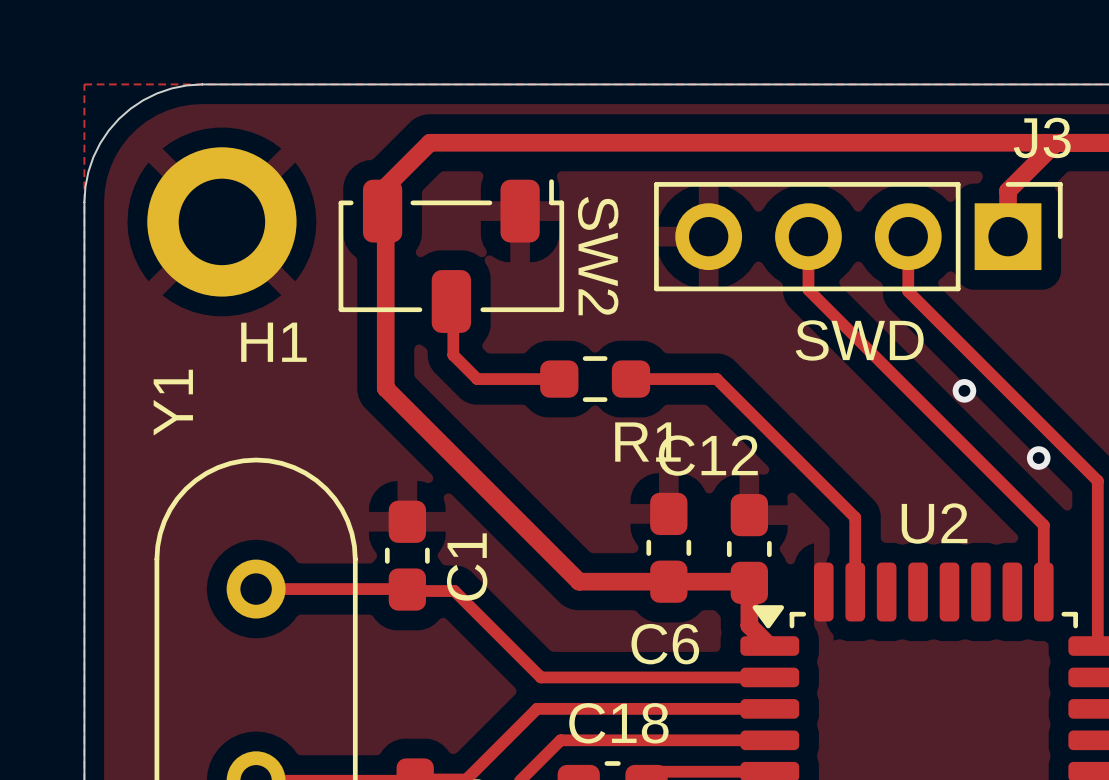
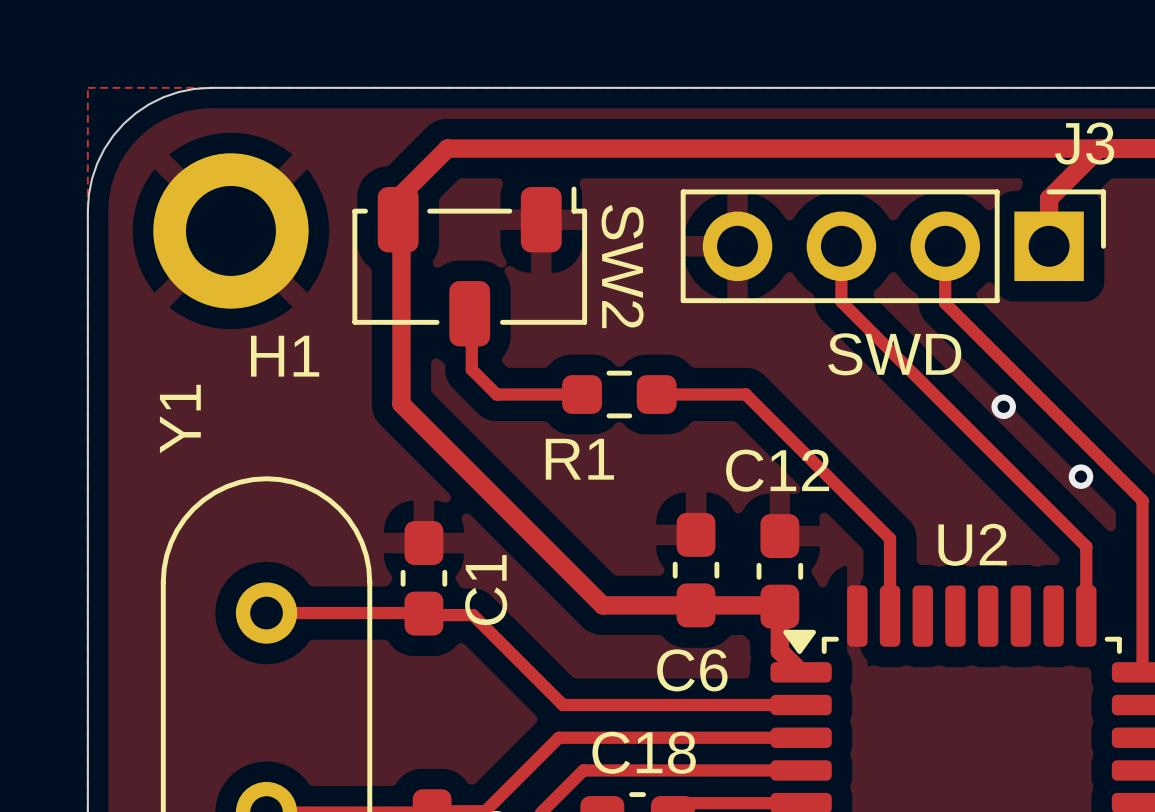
R1 name position: R1 (647, 442) -> R1 (579, 459)
C12 name position: C12 (708, 455) -> C12 (777, 470)

